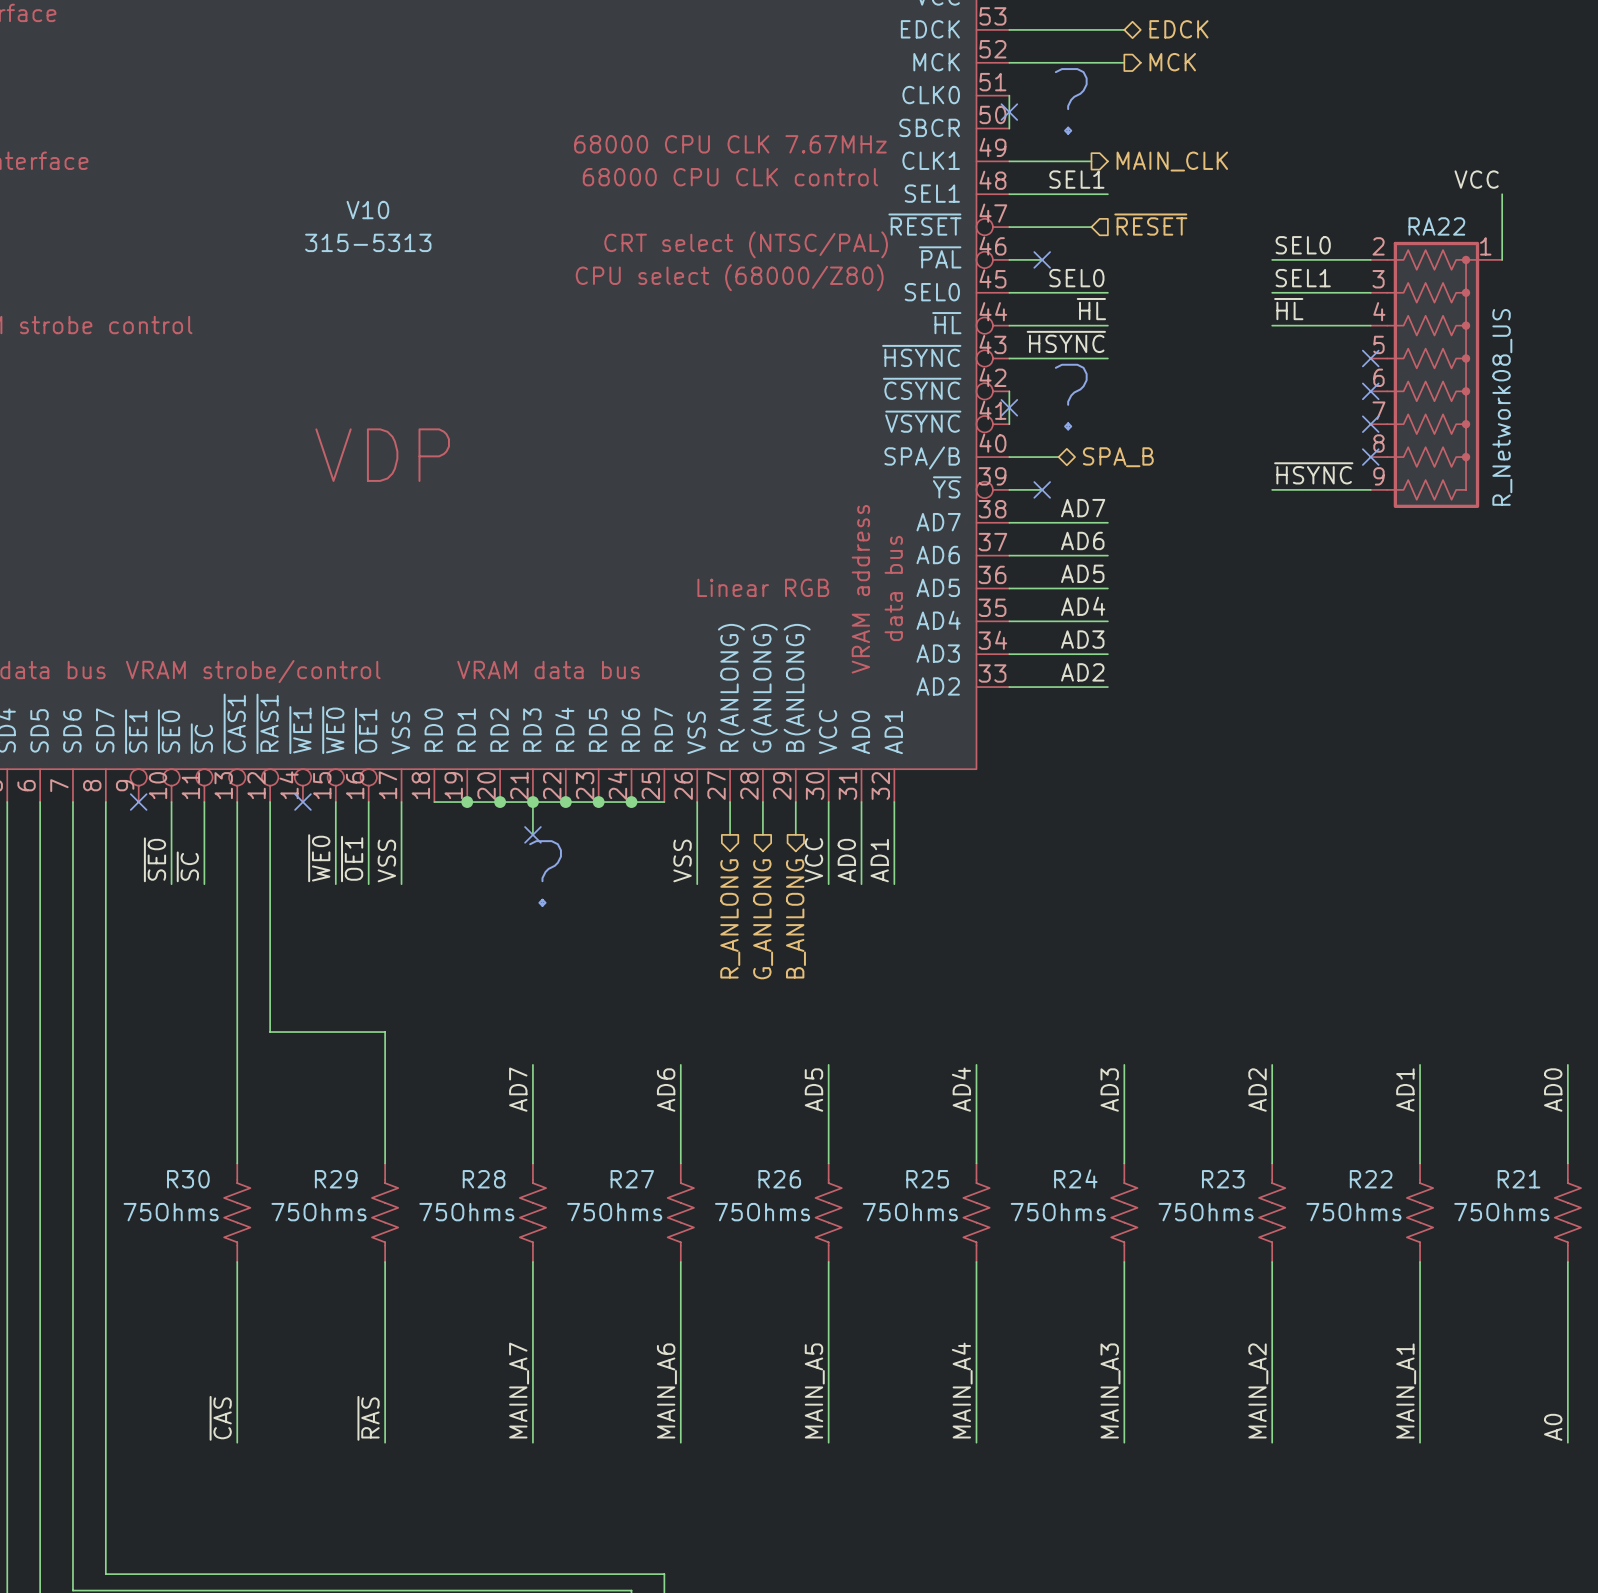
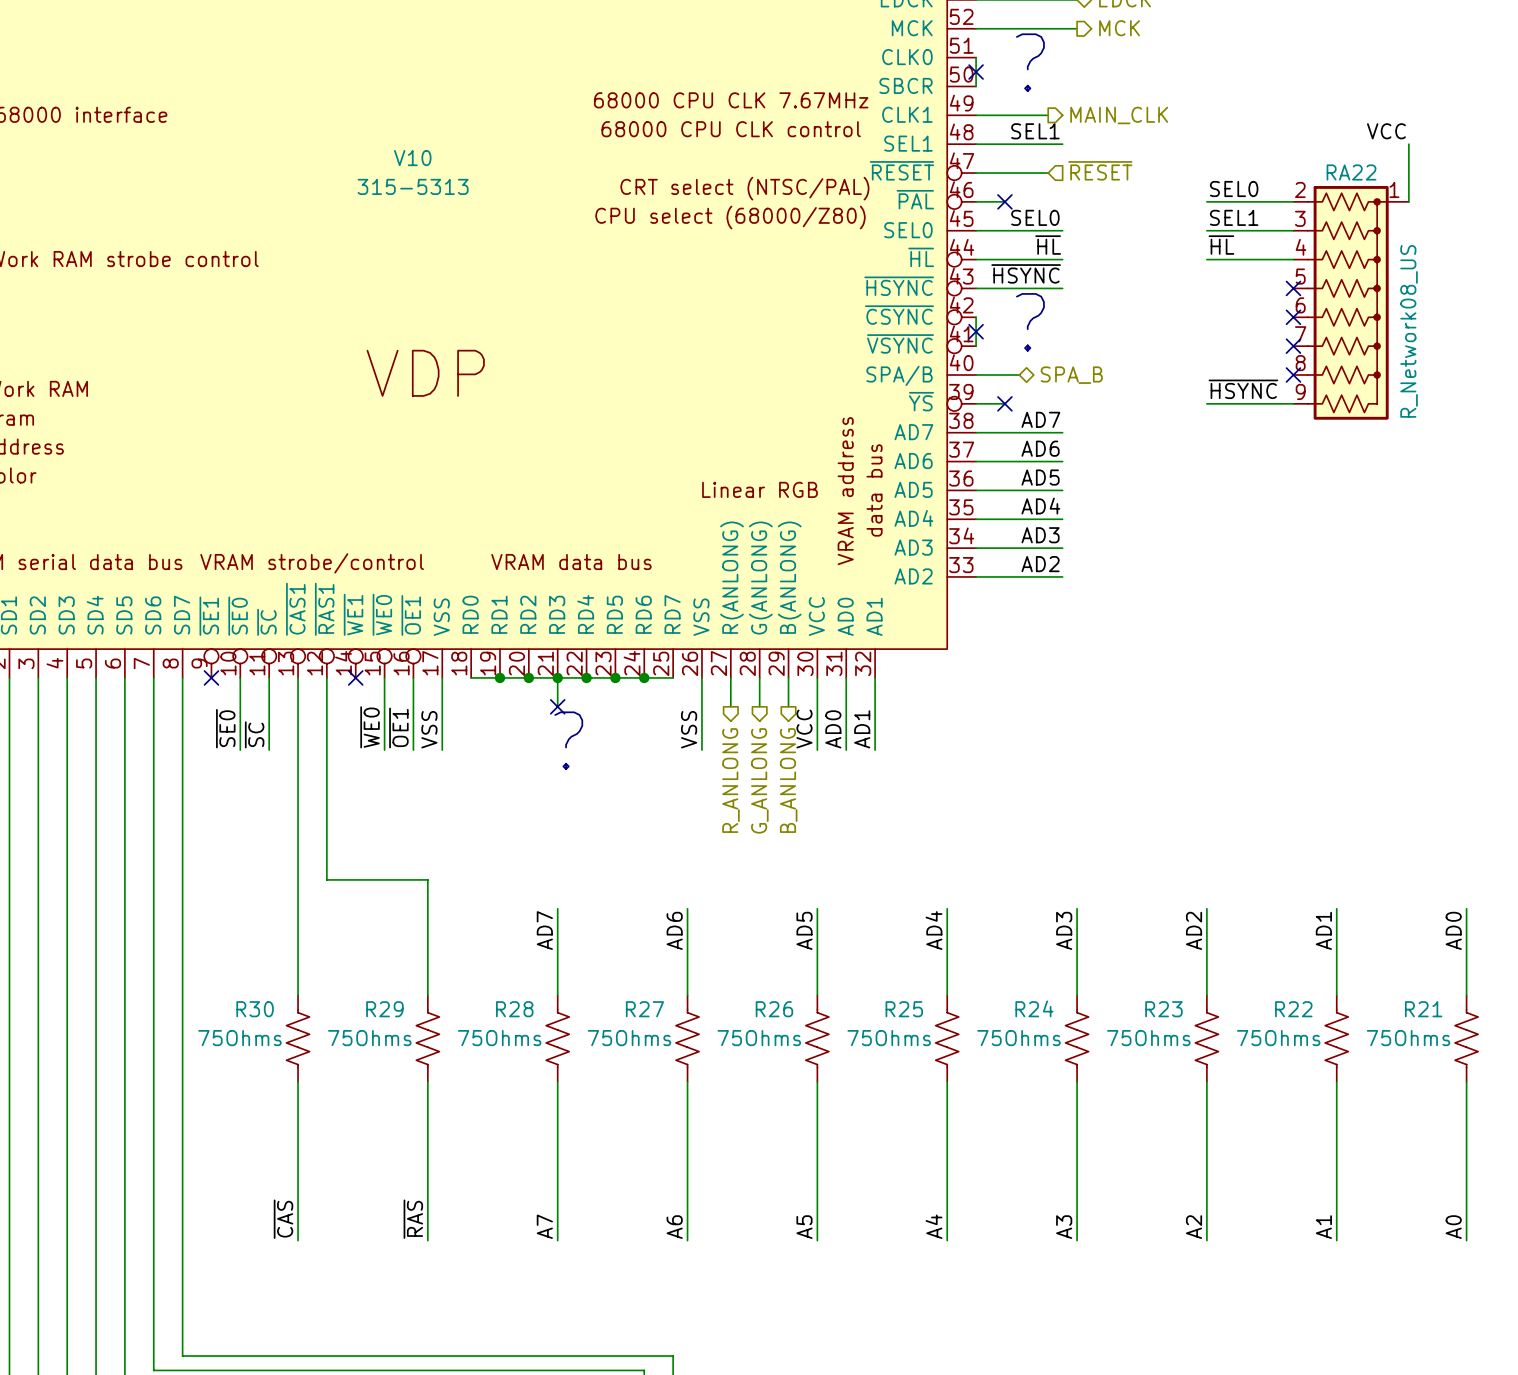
label: MAIN_A7 (519, 1390) -> A7 (544, 1226)
label: MAIN_A6 (666, 1390) -> A6 (674, 1227)
label: MAIN_A5 (814, 1390) -> A5 (804, 1227)
label: MAIN_A4 (962, 1390) -> A4 (934, 1226)
label: MAIN_A3 (1110, 1390) -> A3 (1064, 1227)
label: MAIN_A2 (1258, 1390) -> A2 (1194, 1227)
label: MAIN_A1 (1406, 1390) -> A1 (1323, 1227)

